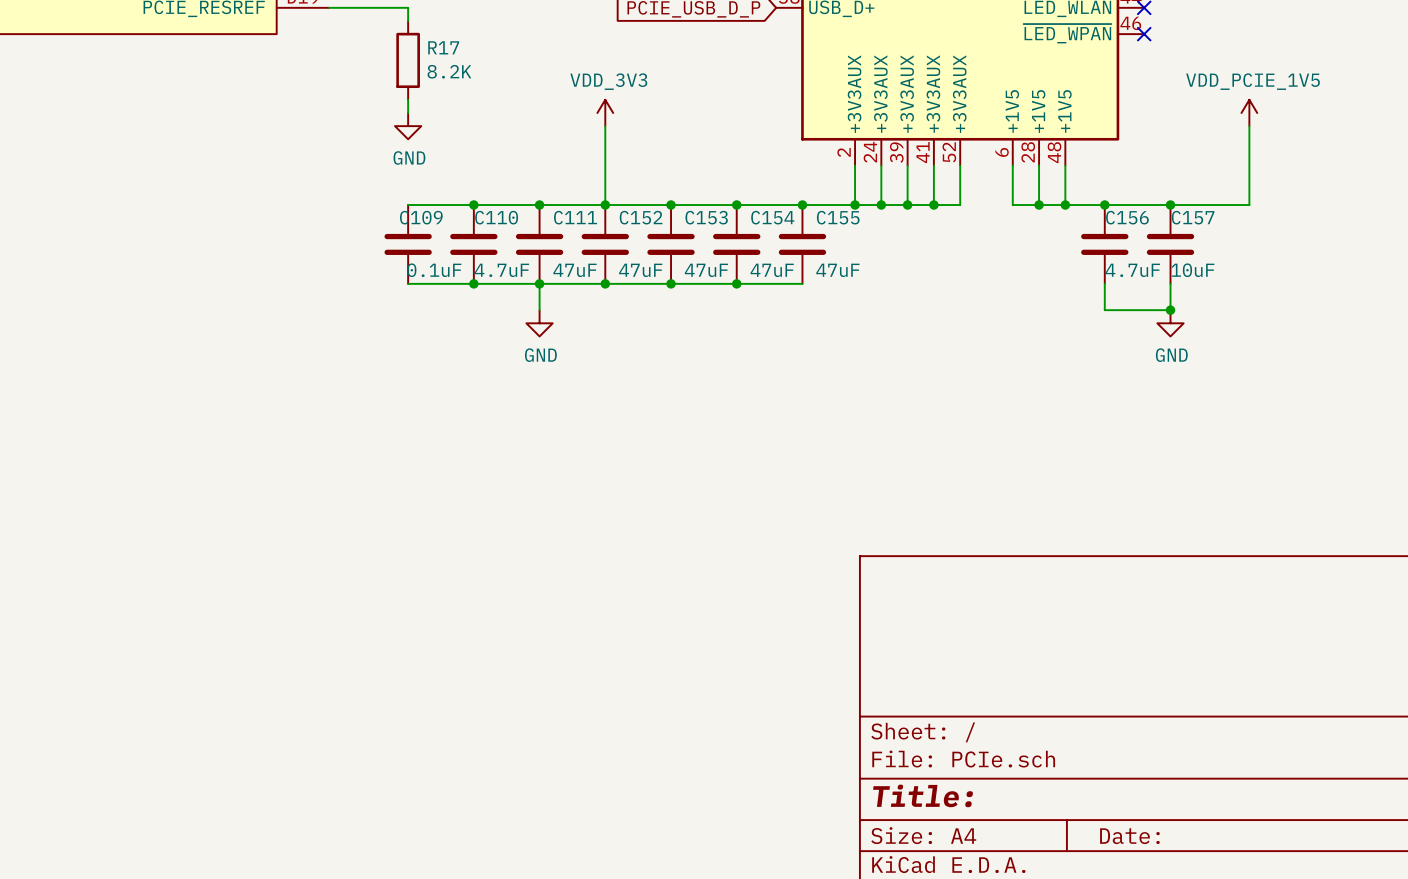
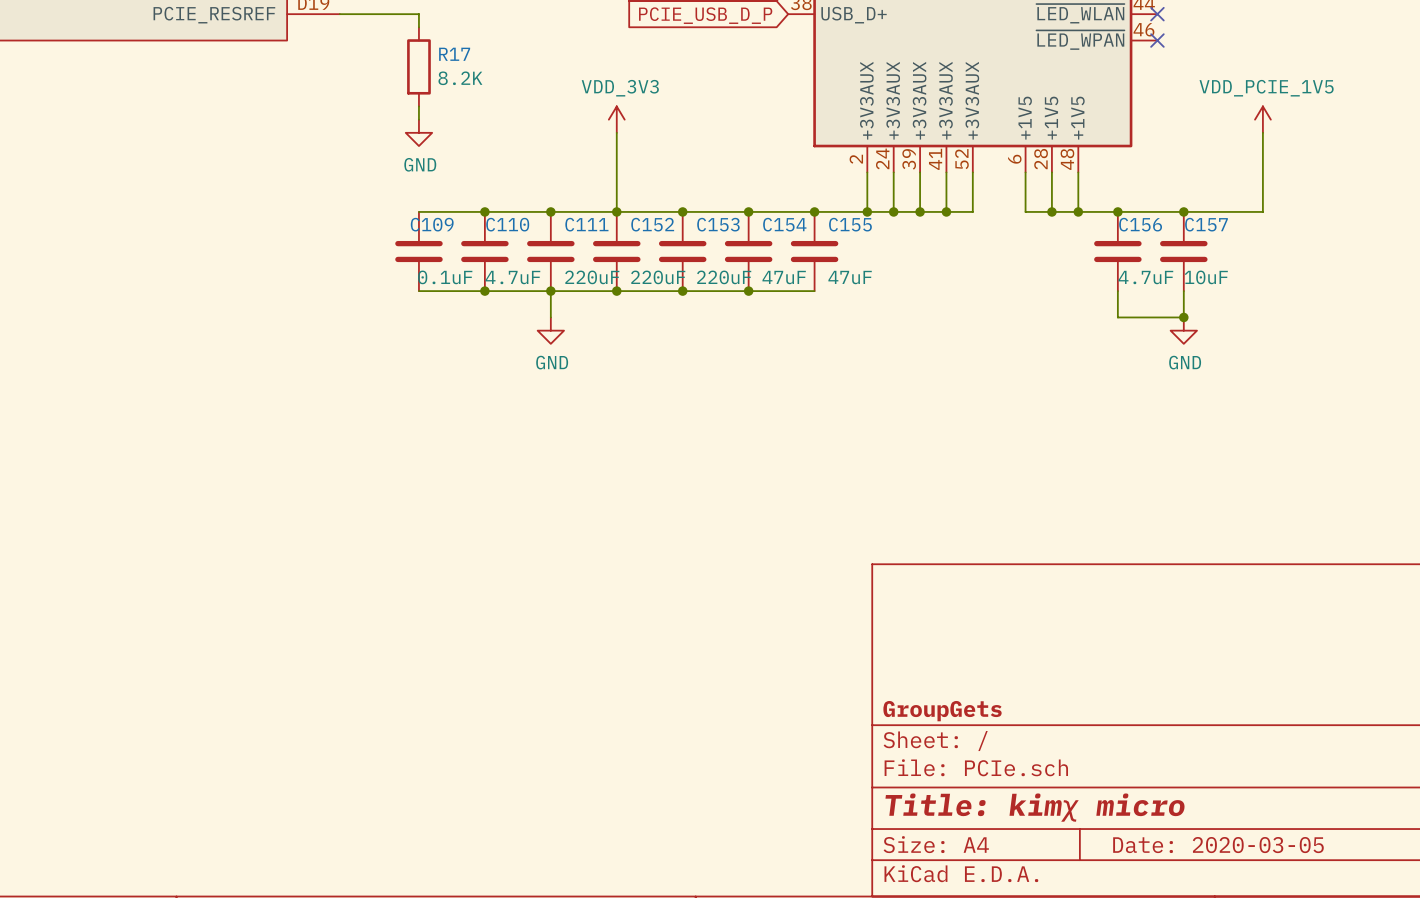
C111 value: 47uF (574, 270) -> 220uF (592, 277)
C152 value: 47uF (640, 270) -> 220uF (658, 277)
C153 value: 47uF (706, 270) -> 220uF (724, 277)
title block: none -> GroupGets (942, 711)
title block: Title: (923, 795) -> Title: kimχ micro (1035, 807)
title block: Date: (1129, 836) -> Date: 2020-03-05 (1218, 845)

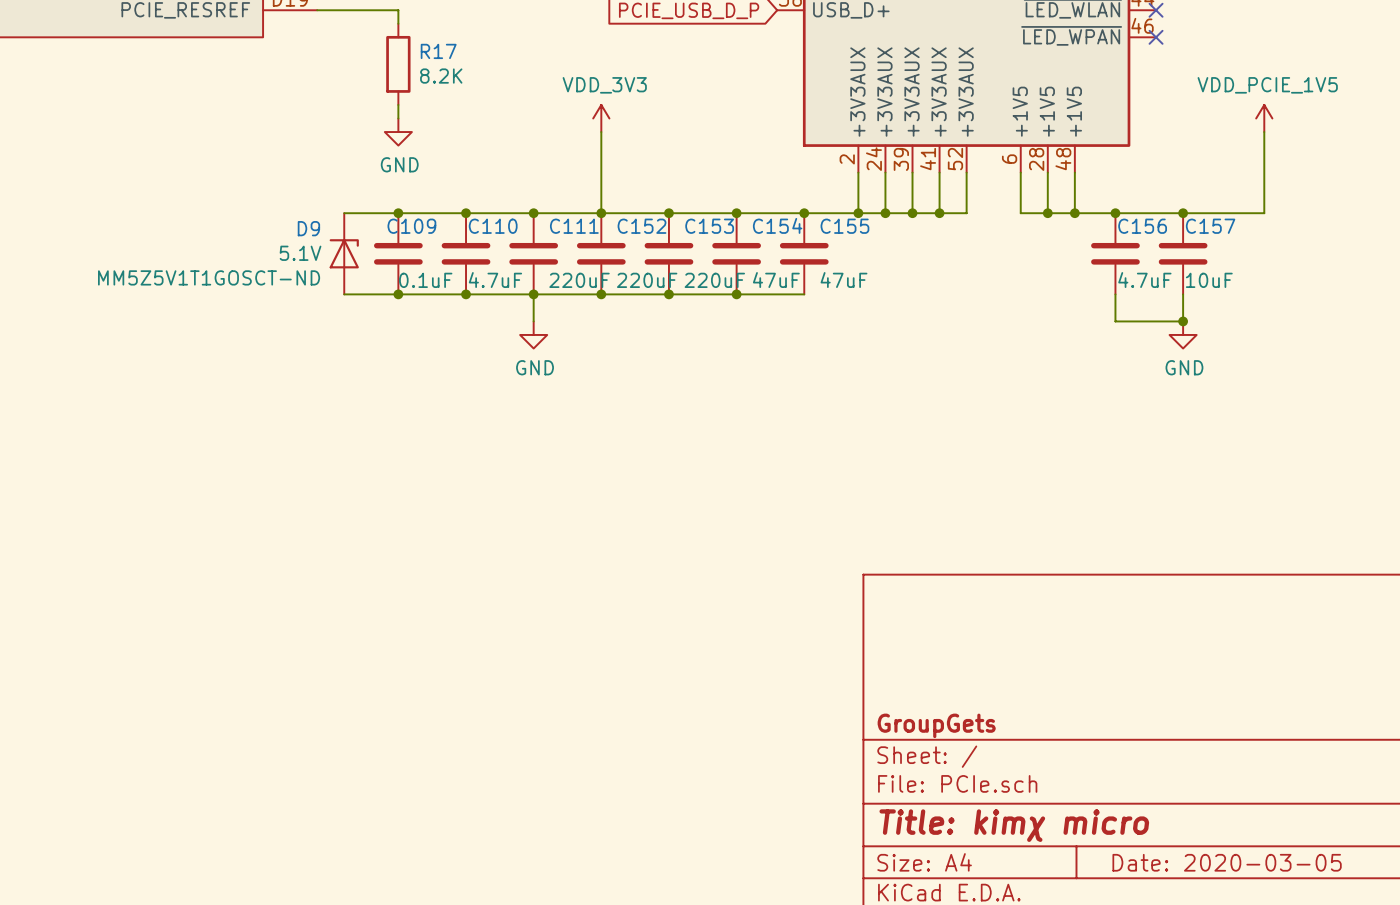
wire: none -> (344, 213) (398, 213)
junction: none -> (398, 213)
D9: none -> 5.1V (344, 253)
wire: none -> (344, 294) (398, 294)
junction: none -> (398, 294)

